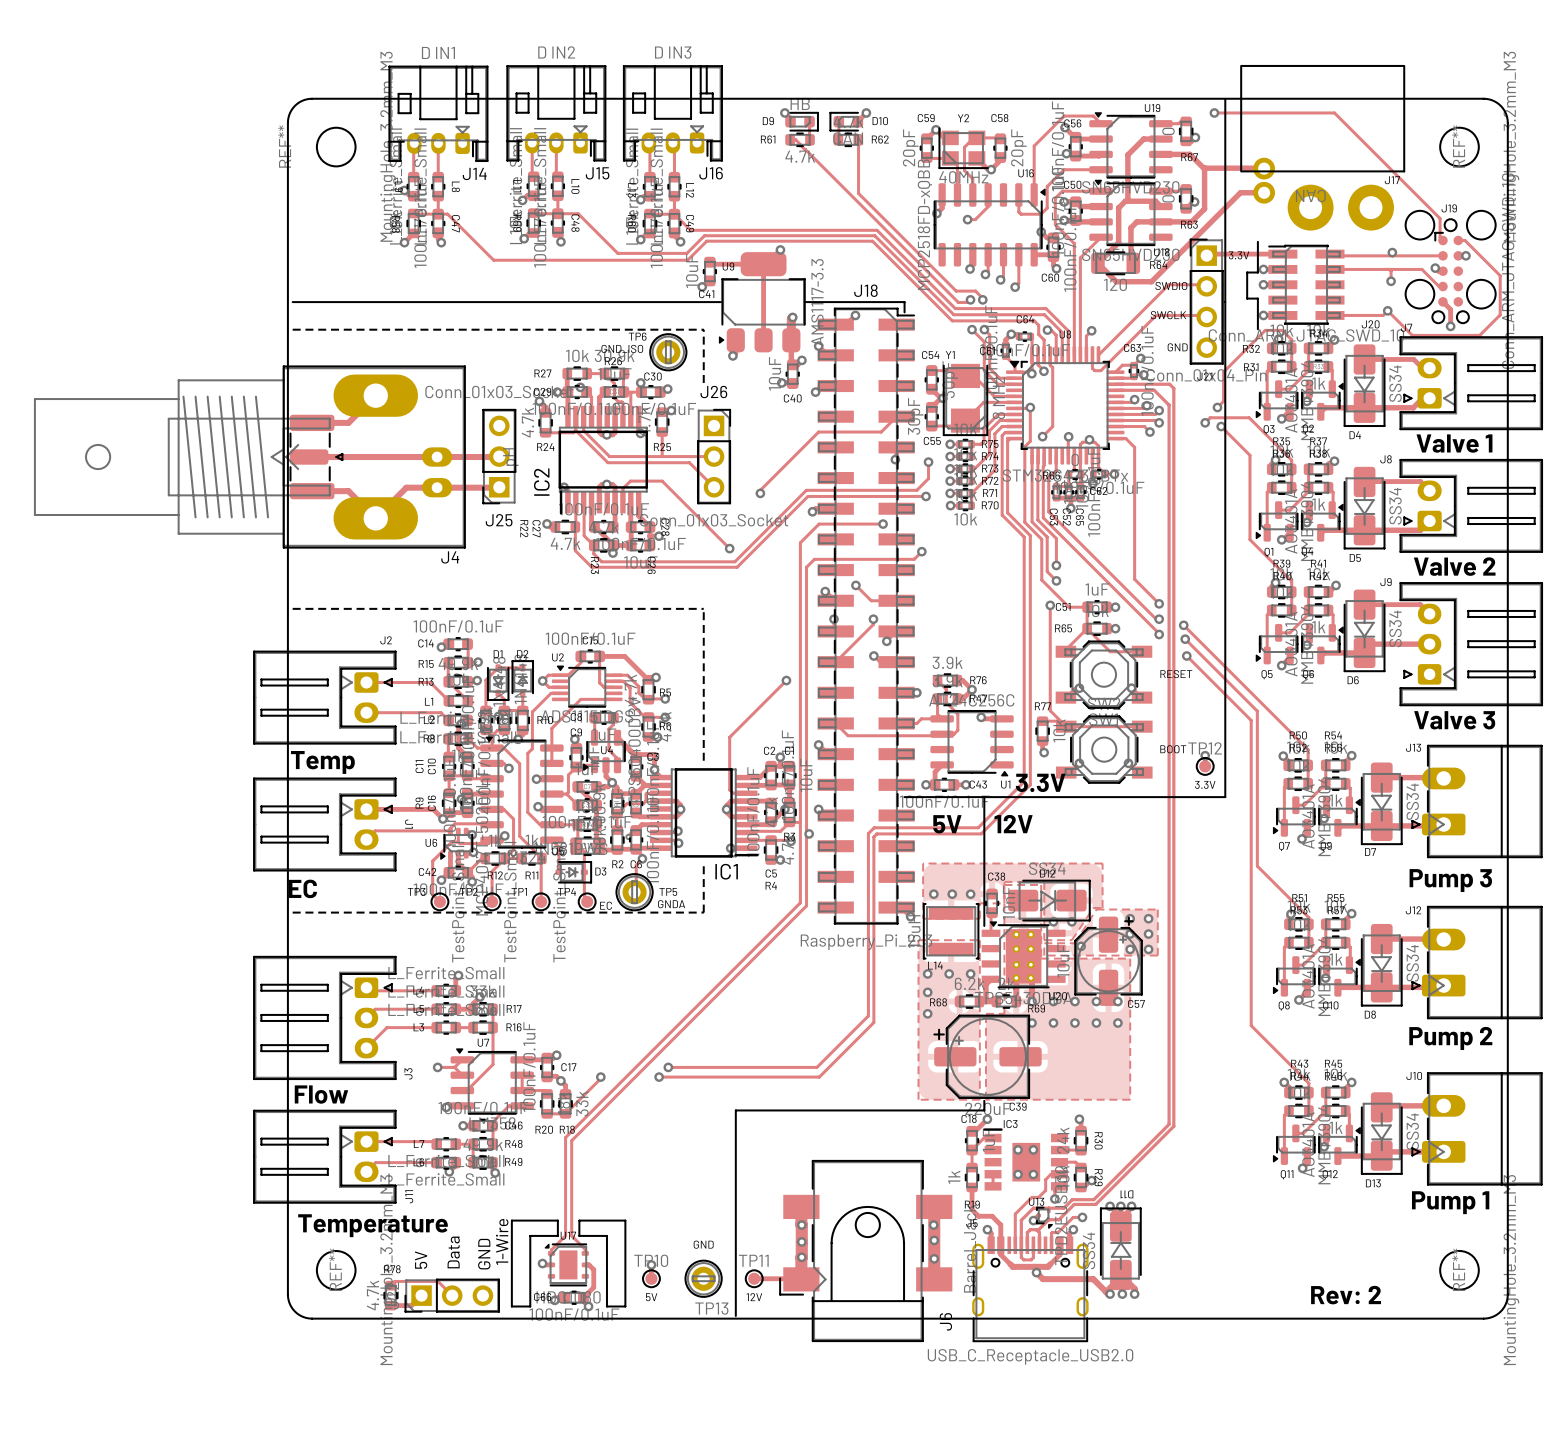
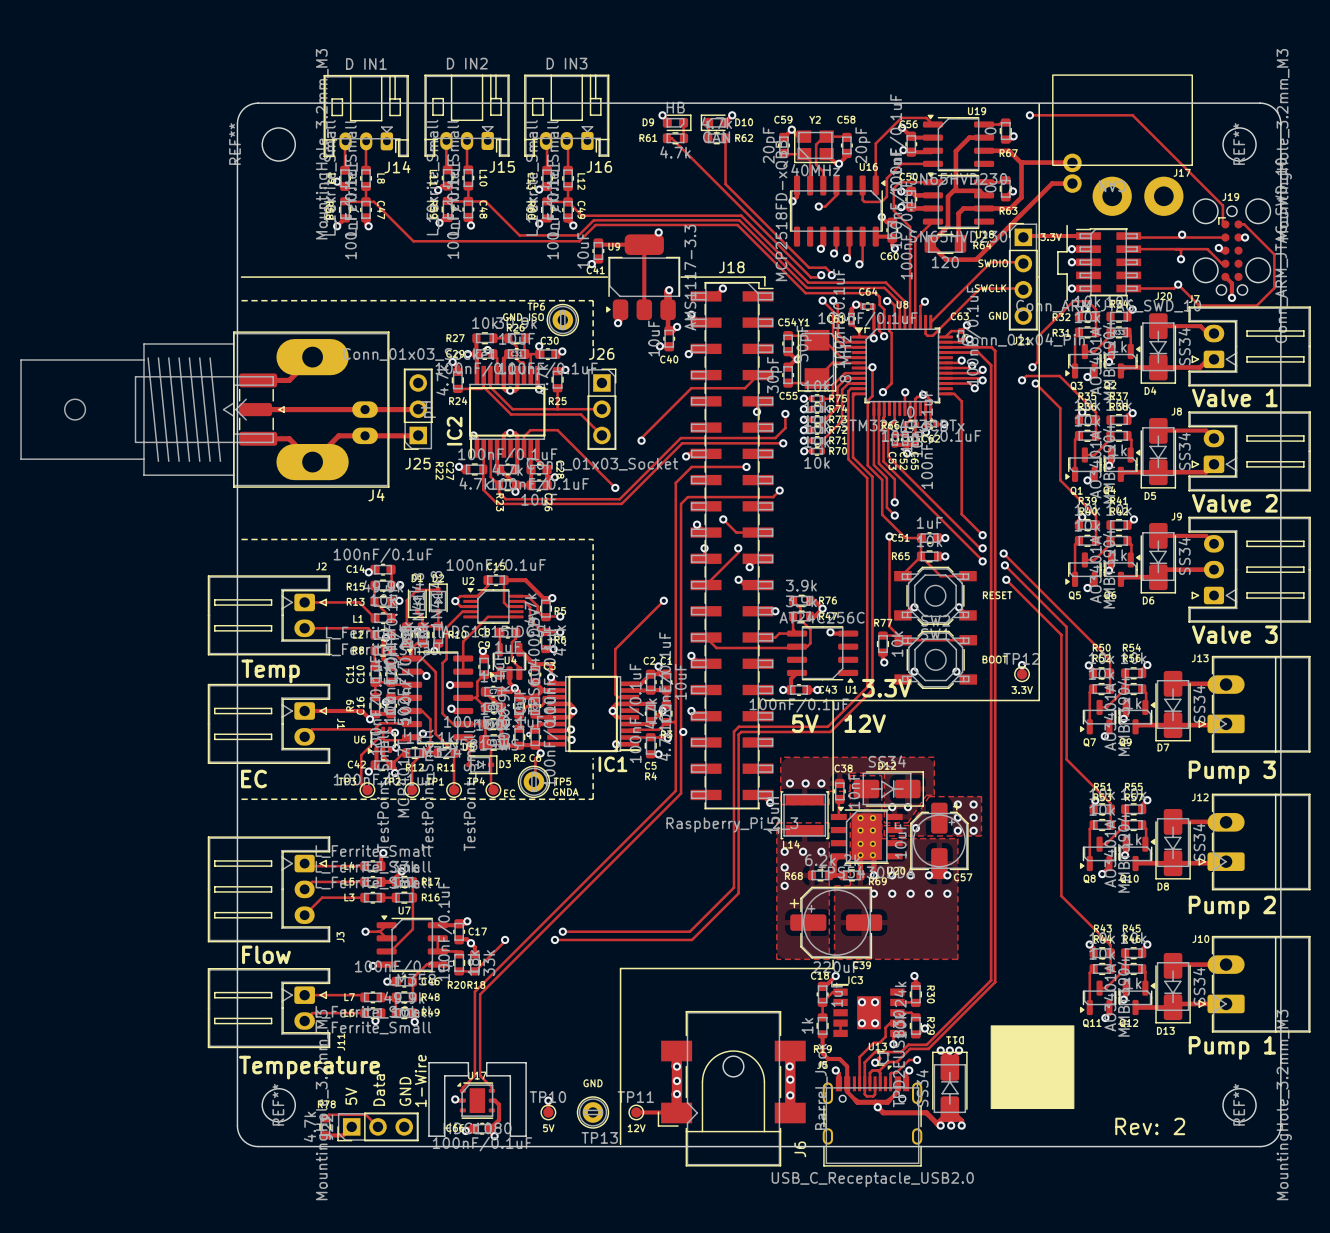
drawing: none -> [990, 1025, 1075, 1110]

